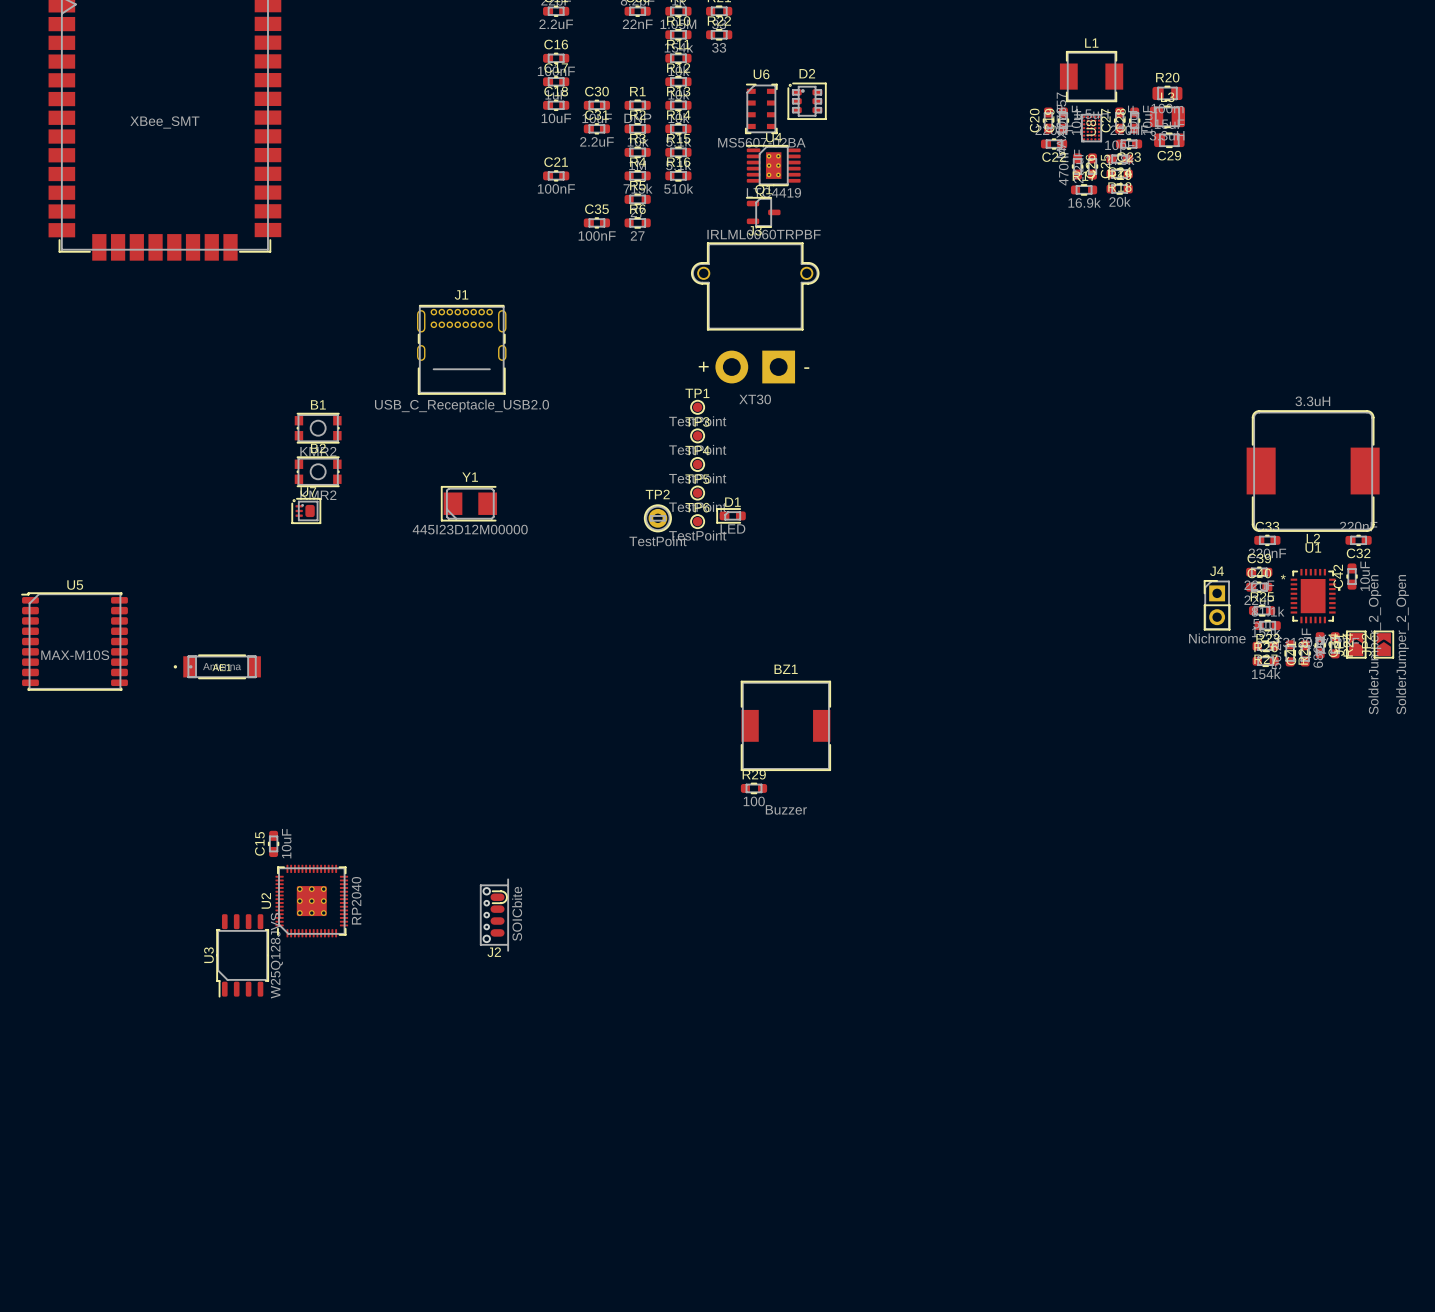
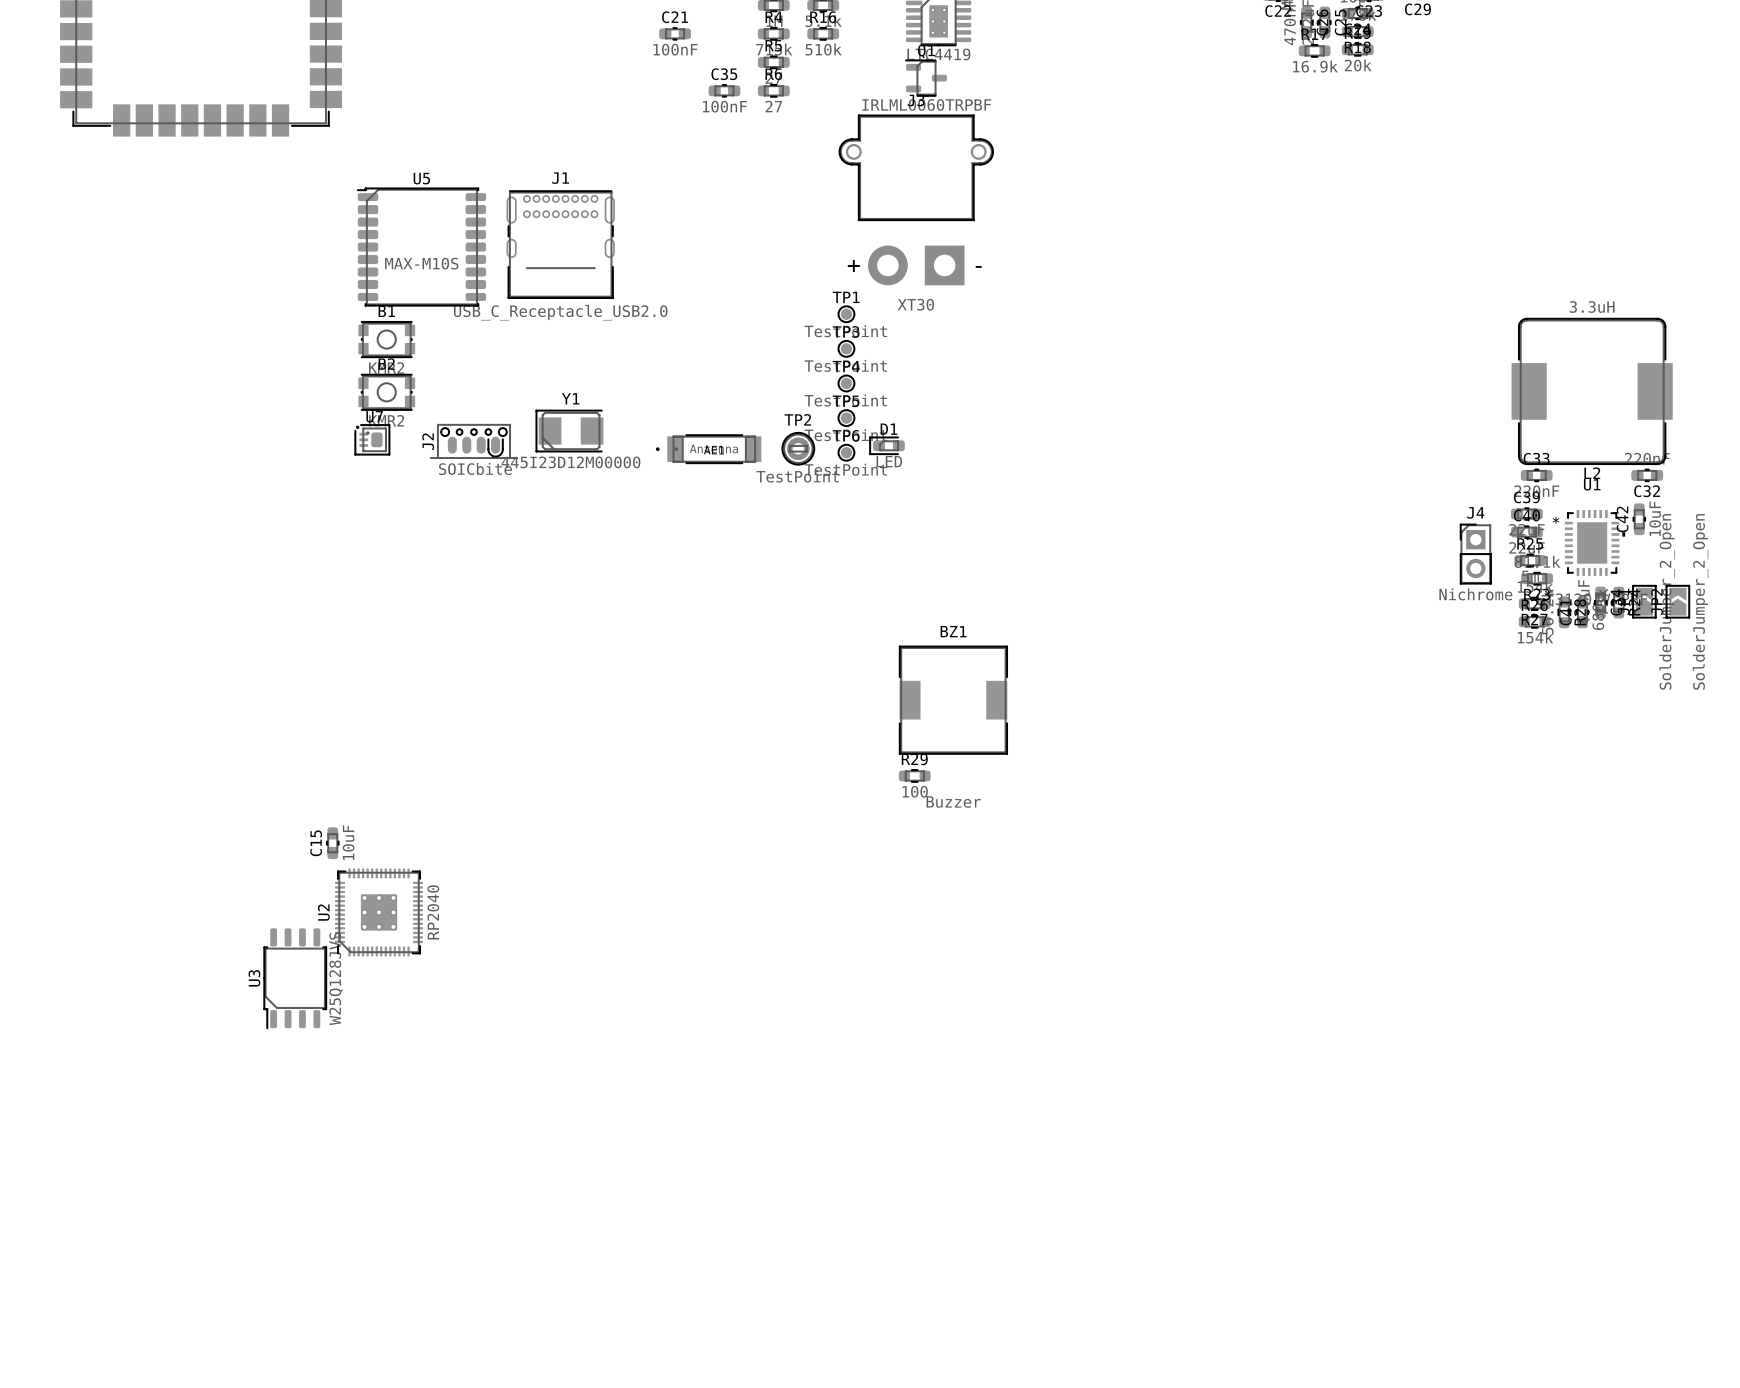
U5 position: (74, 641) -> (421, 247)
AE1 position: (217, 666) -> (708, 449)
J2 rotation: 0° (494, 915) -> 90° clockwise (473, 441)
J2 position: (494, 915) -> (473, 441)

